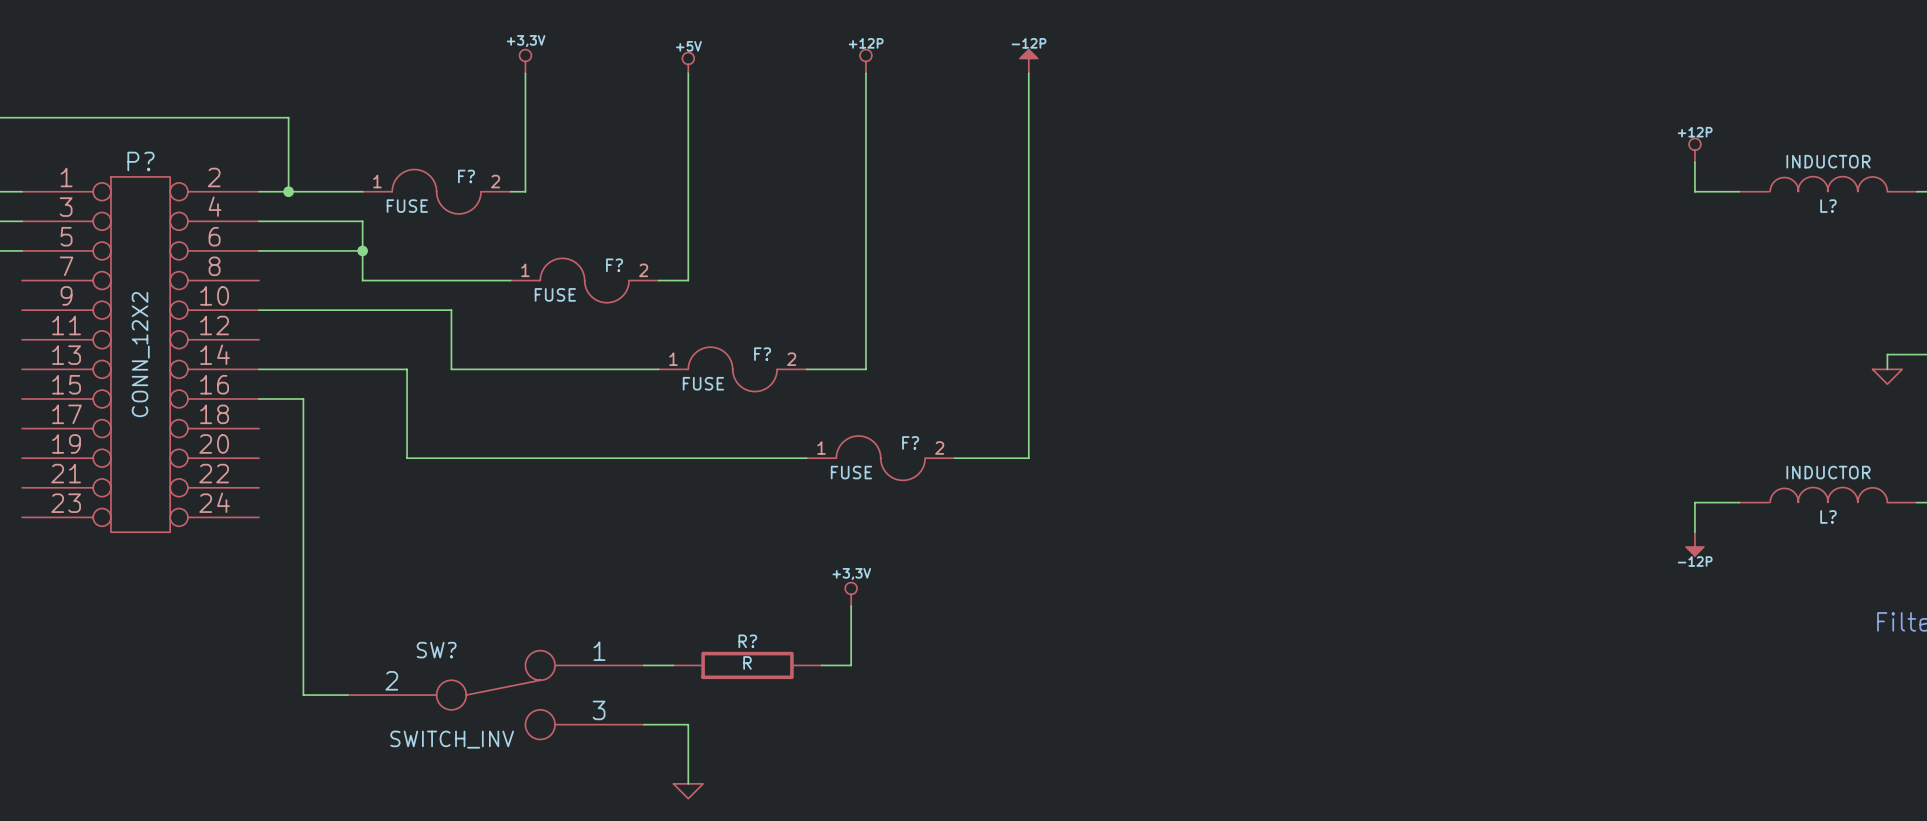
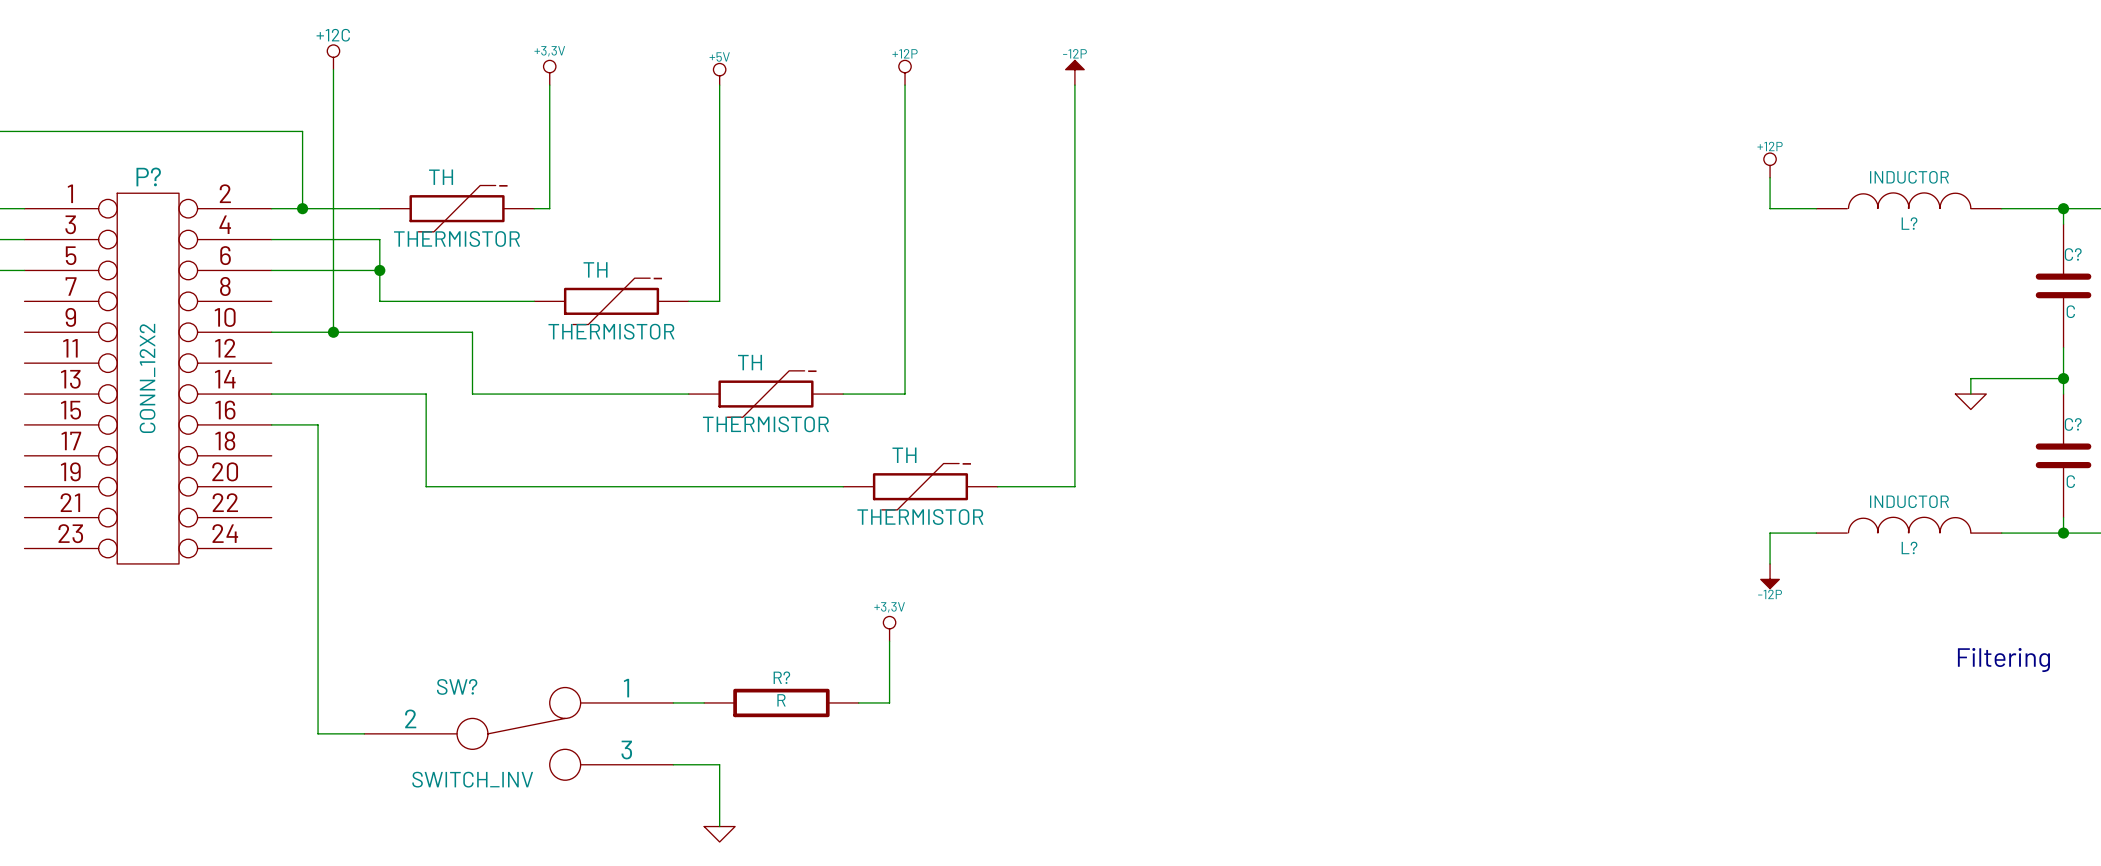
power symbol: none -> (333, 57)
wire: none -> (333, 69) (333, 332)
F?: FUSE (436, 191) -> none
part: none -> (457, 208)
F?: FUSE (584, 280) -> none
part: none -> (611, 301)
junction: none -> (333, 332)
F?: FUSE (732, 369) -> none
part: none -> (765, 394)
F?: FUSE (880, 458) -> none
part: none -> (920, 486)

